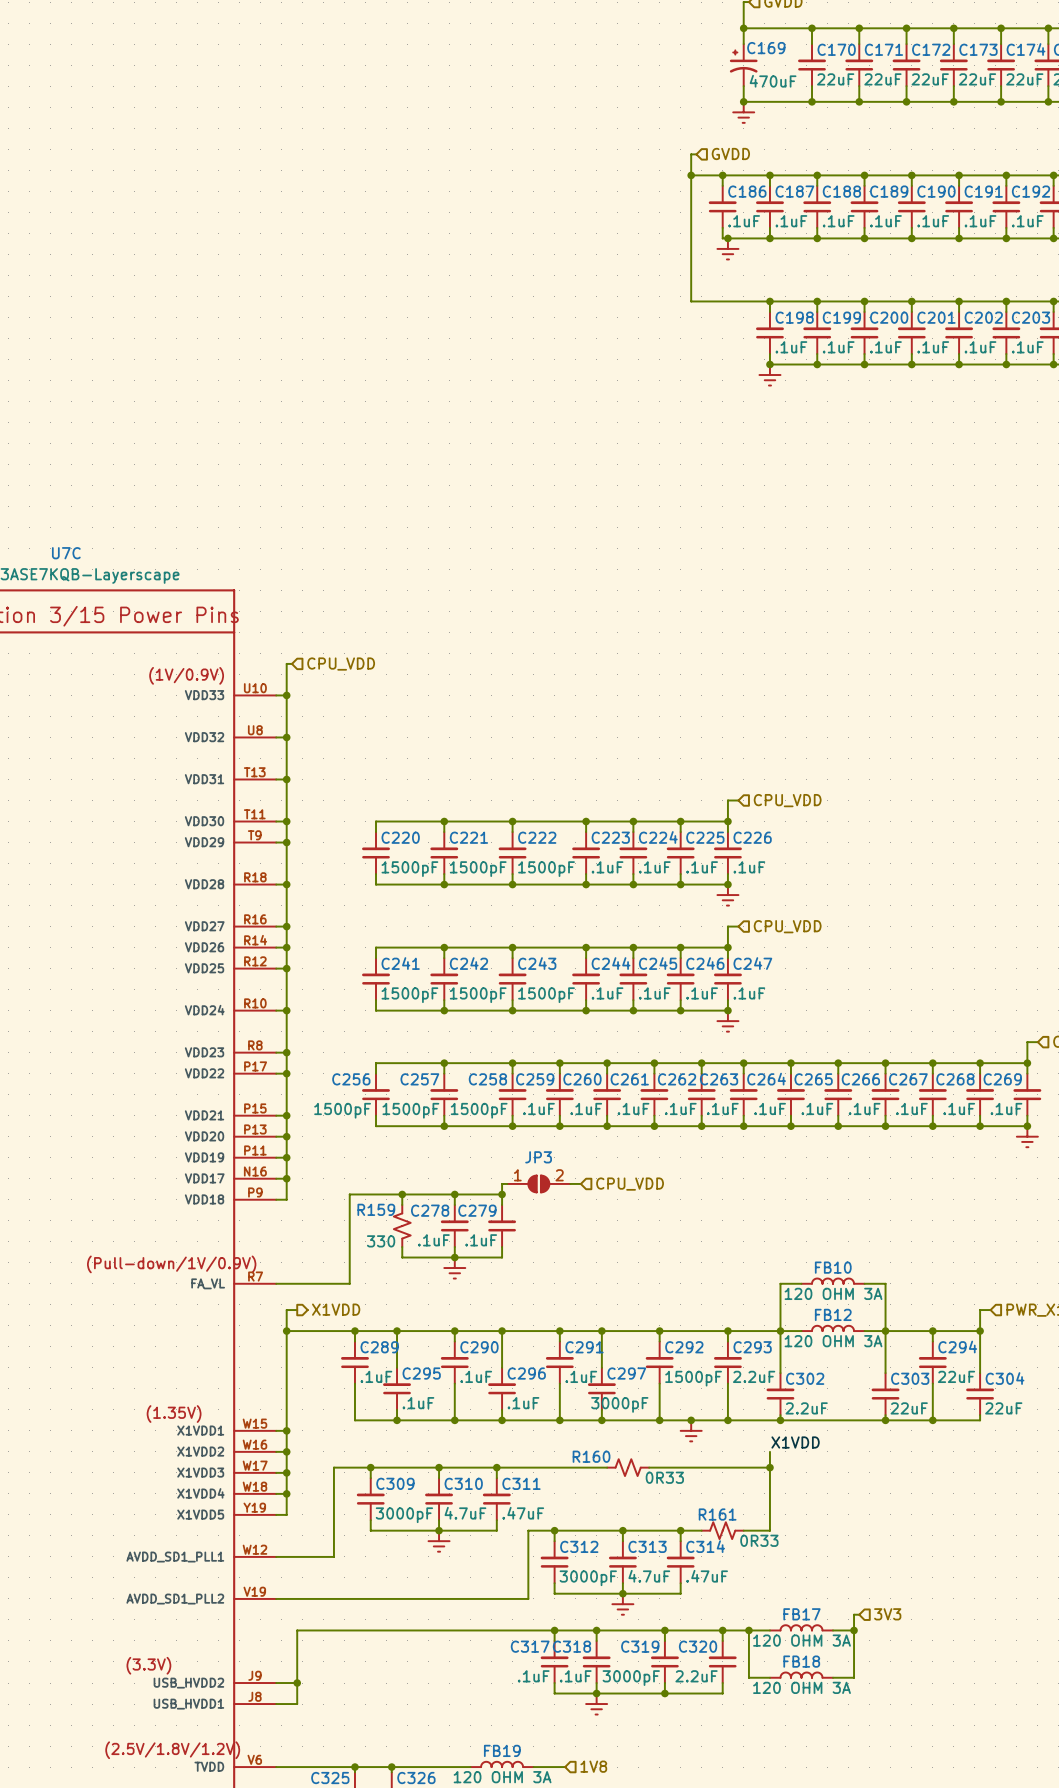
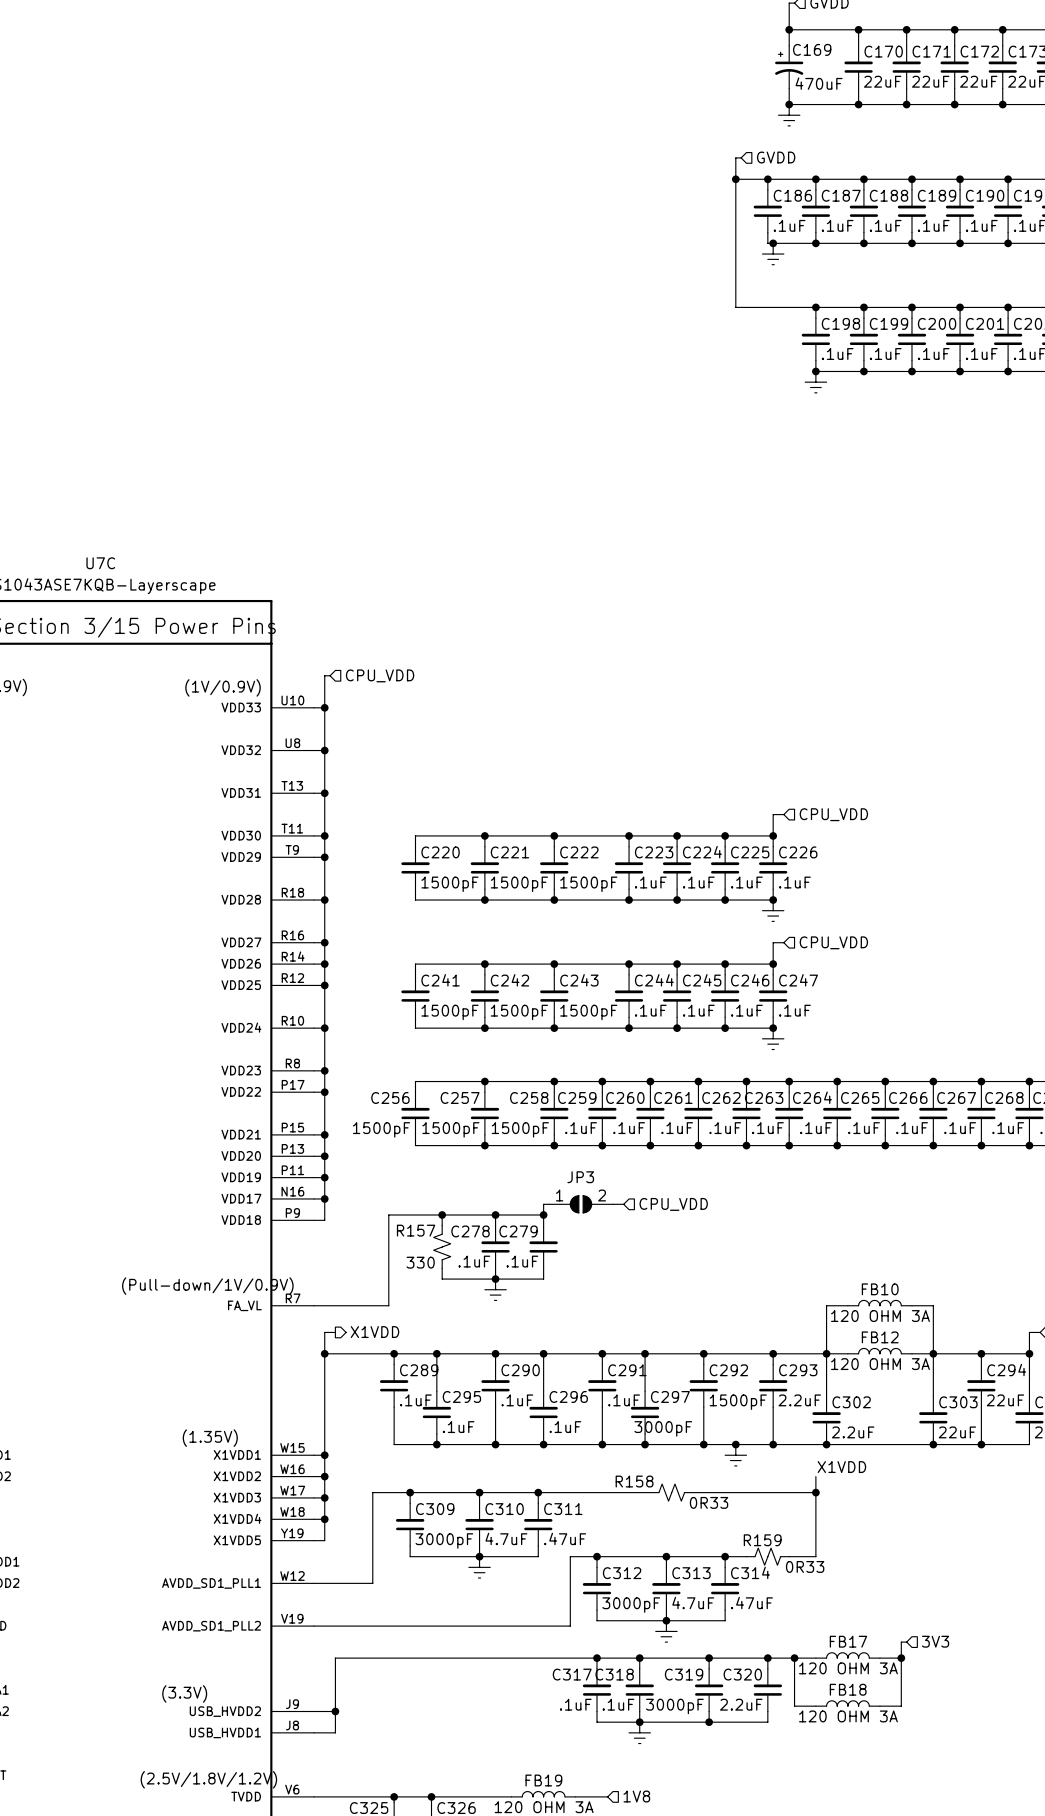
R159 name: R159 (376, 1209) -> R157 (416, 1230)
R160 name: R160 (591, 1456) -> R158 (634, 1481)
R161 name: R161 (717, 1514) -> R159 (762, 1540)

